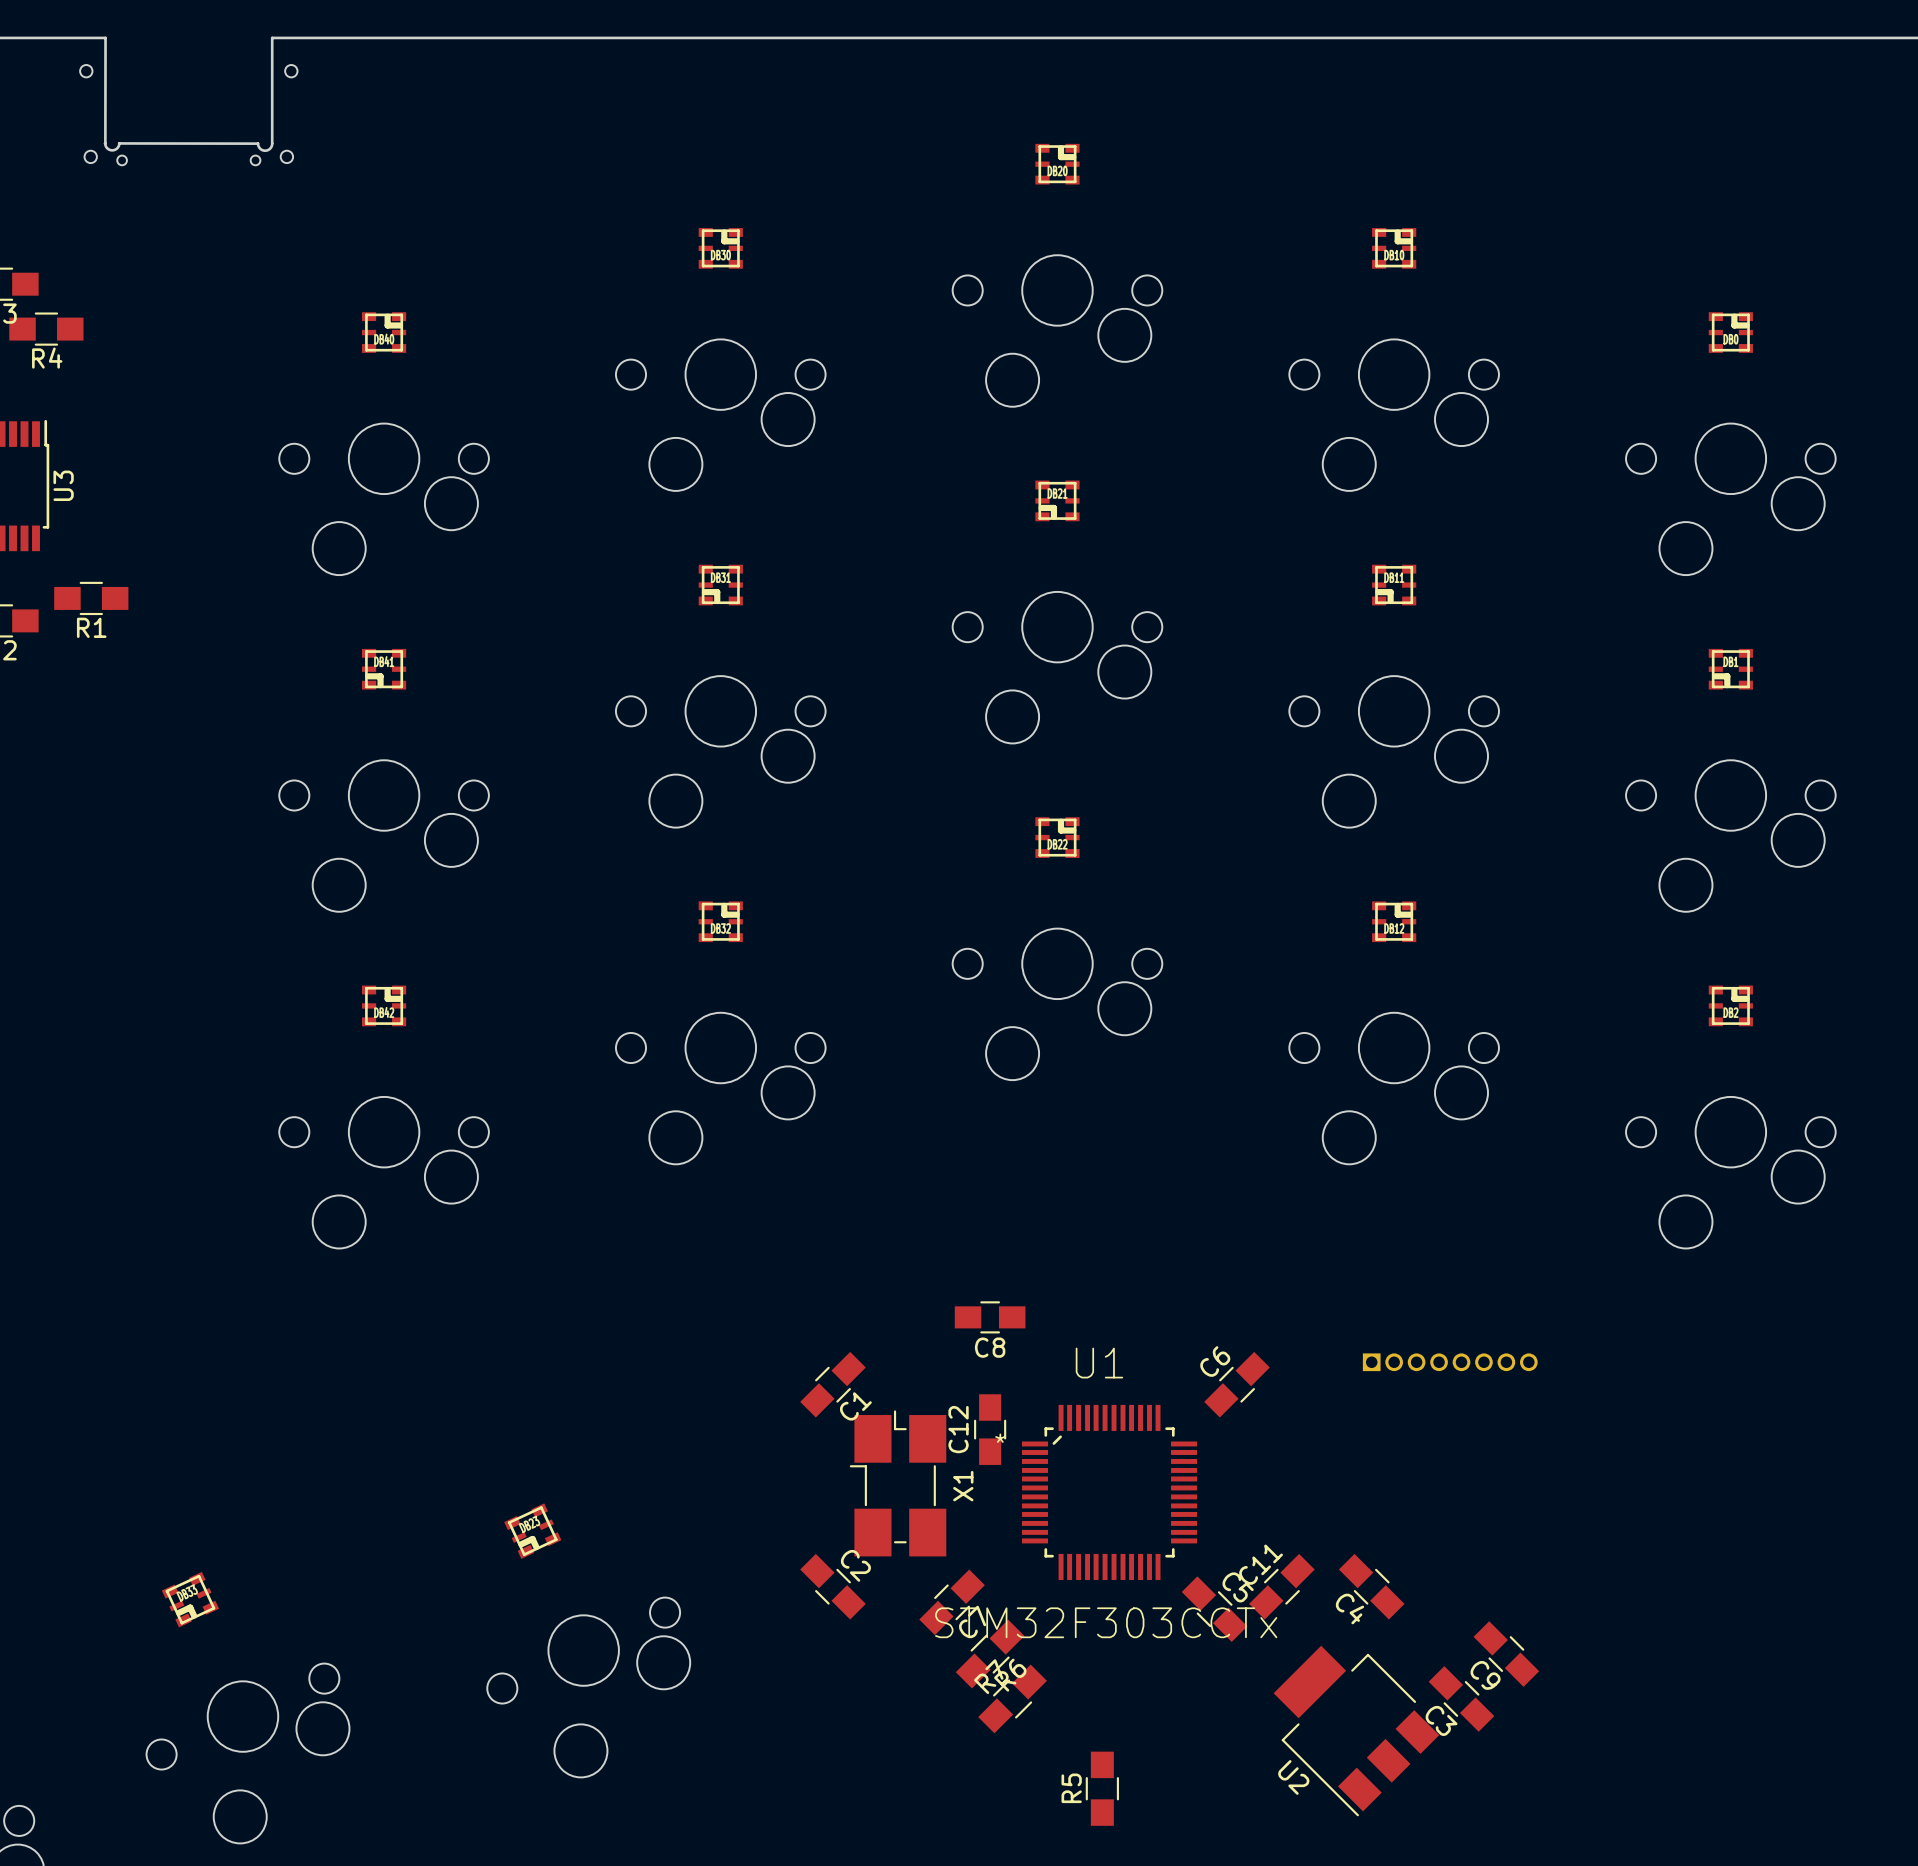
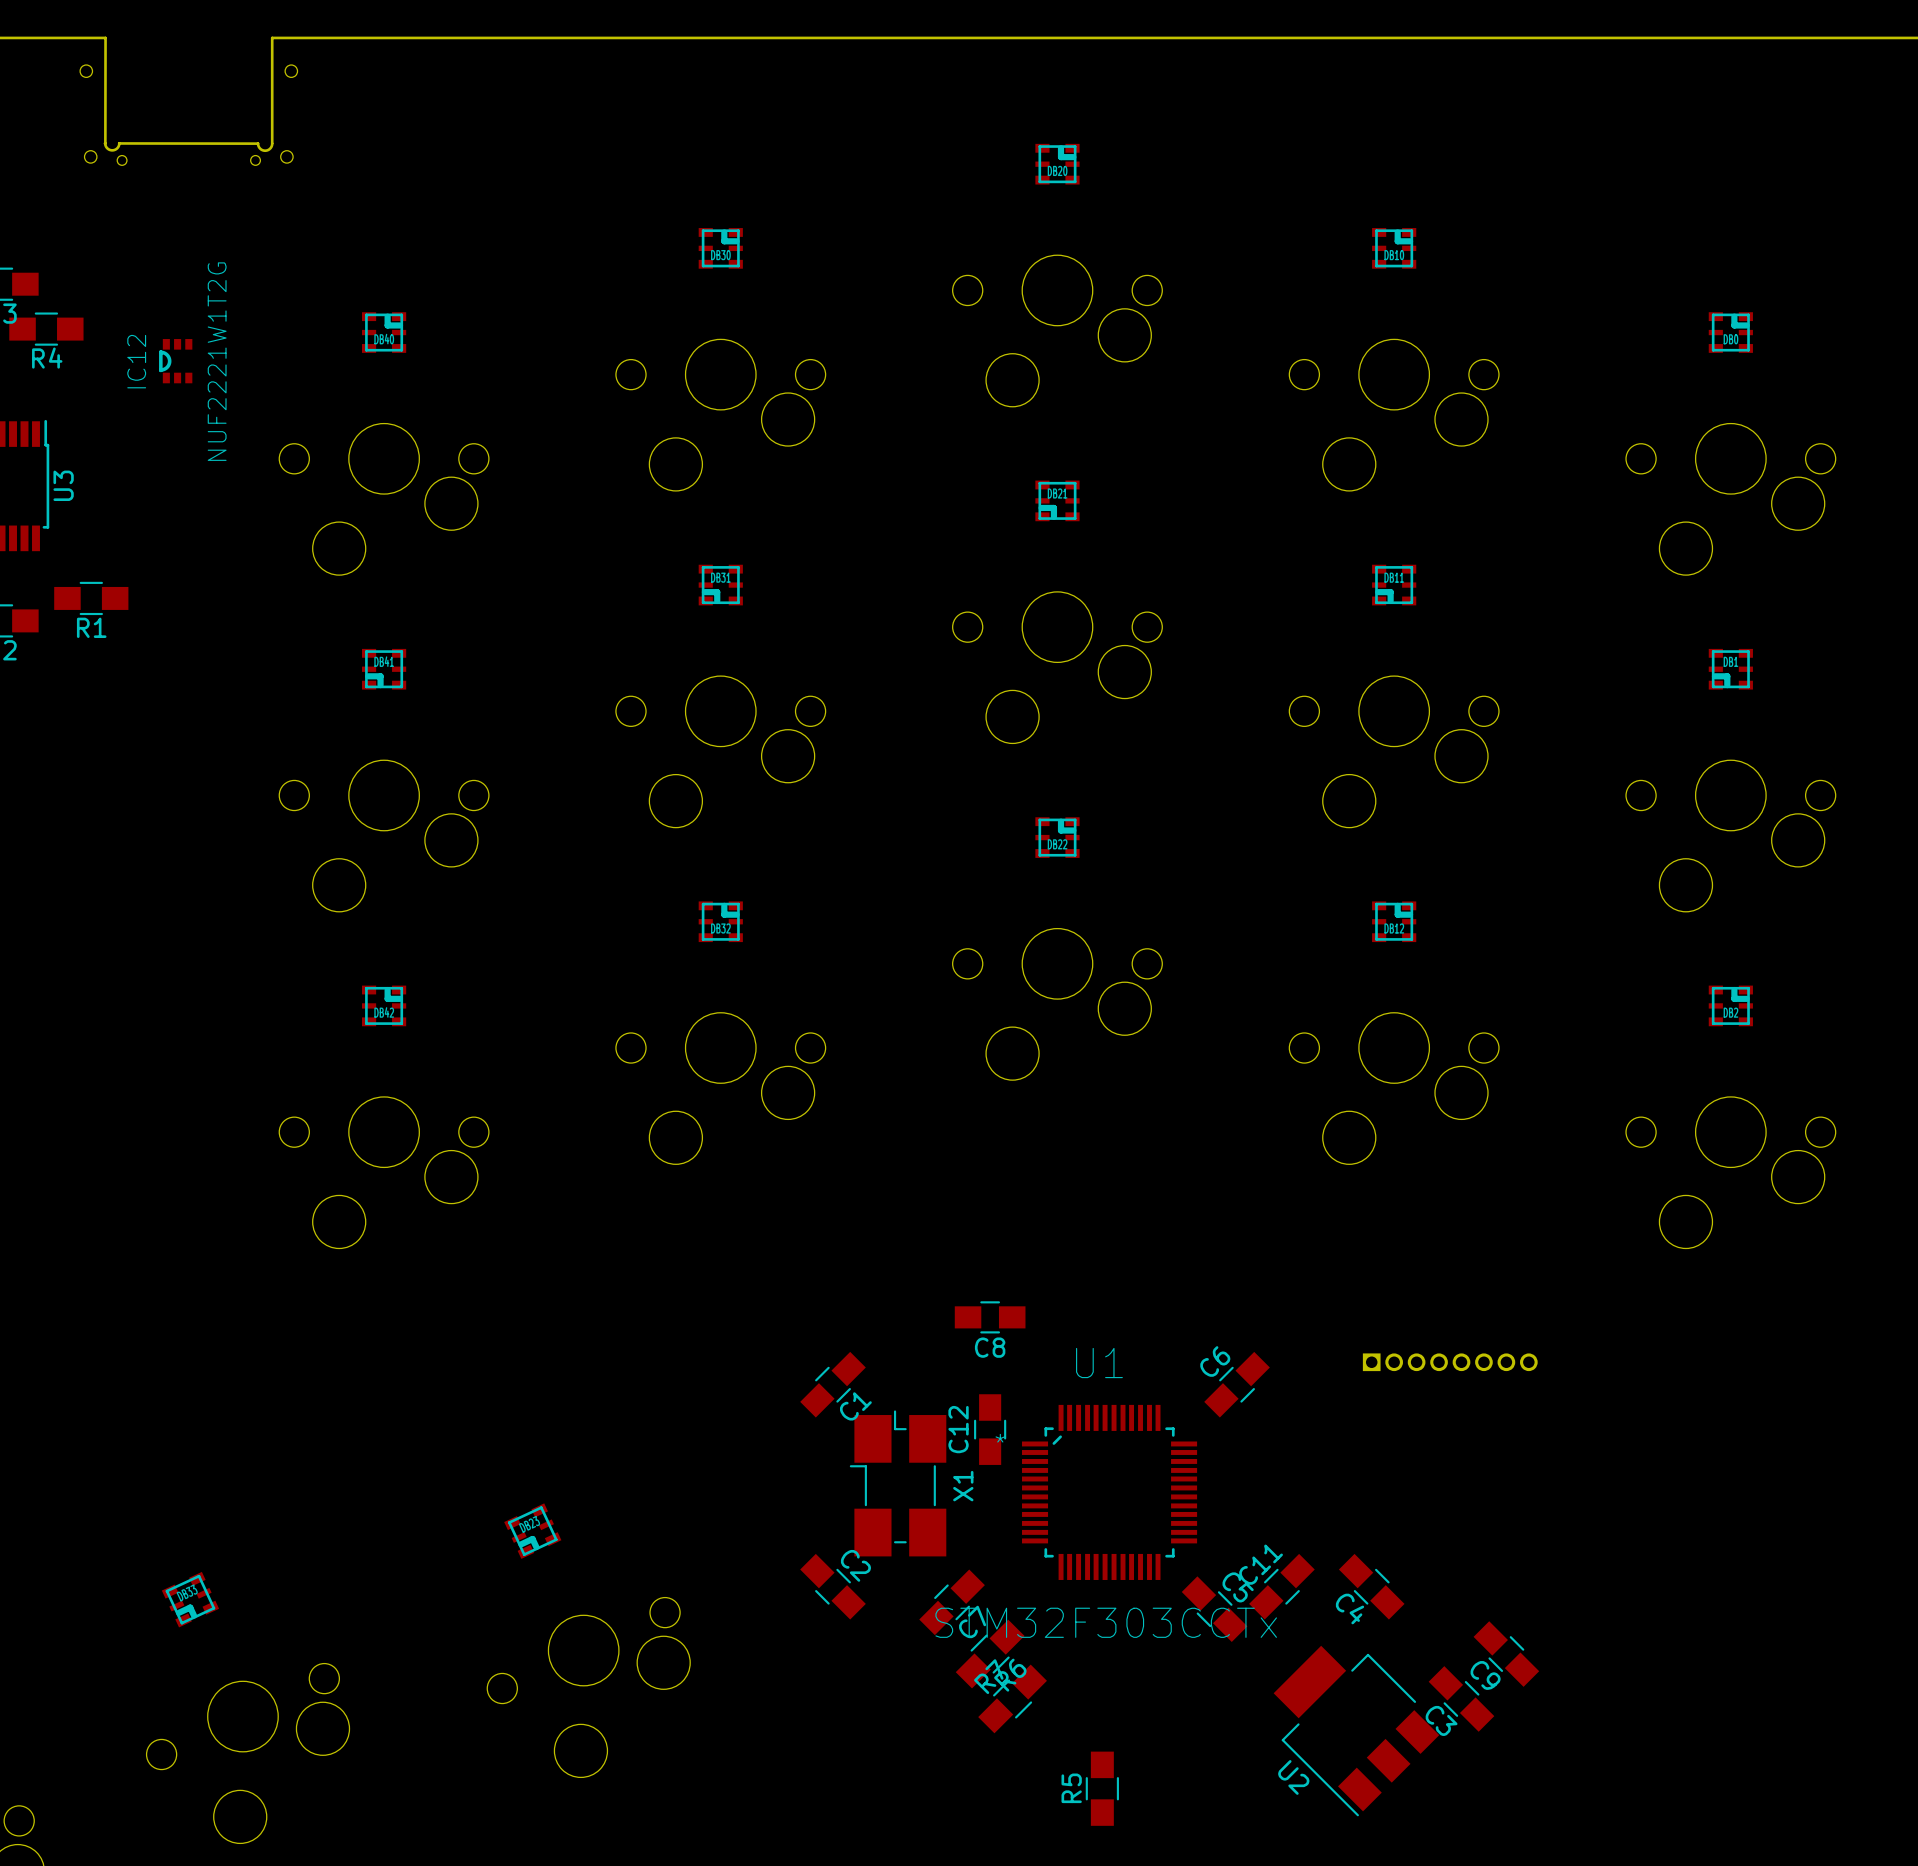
IC12: none -> NUF2221W1T2G (175, 361)

